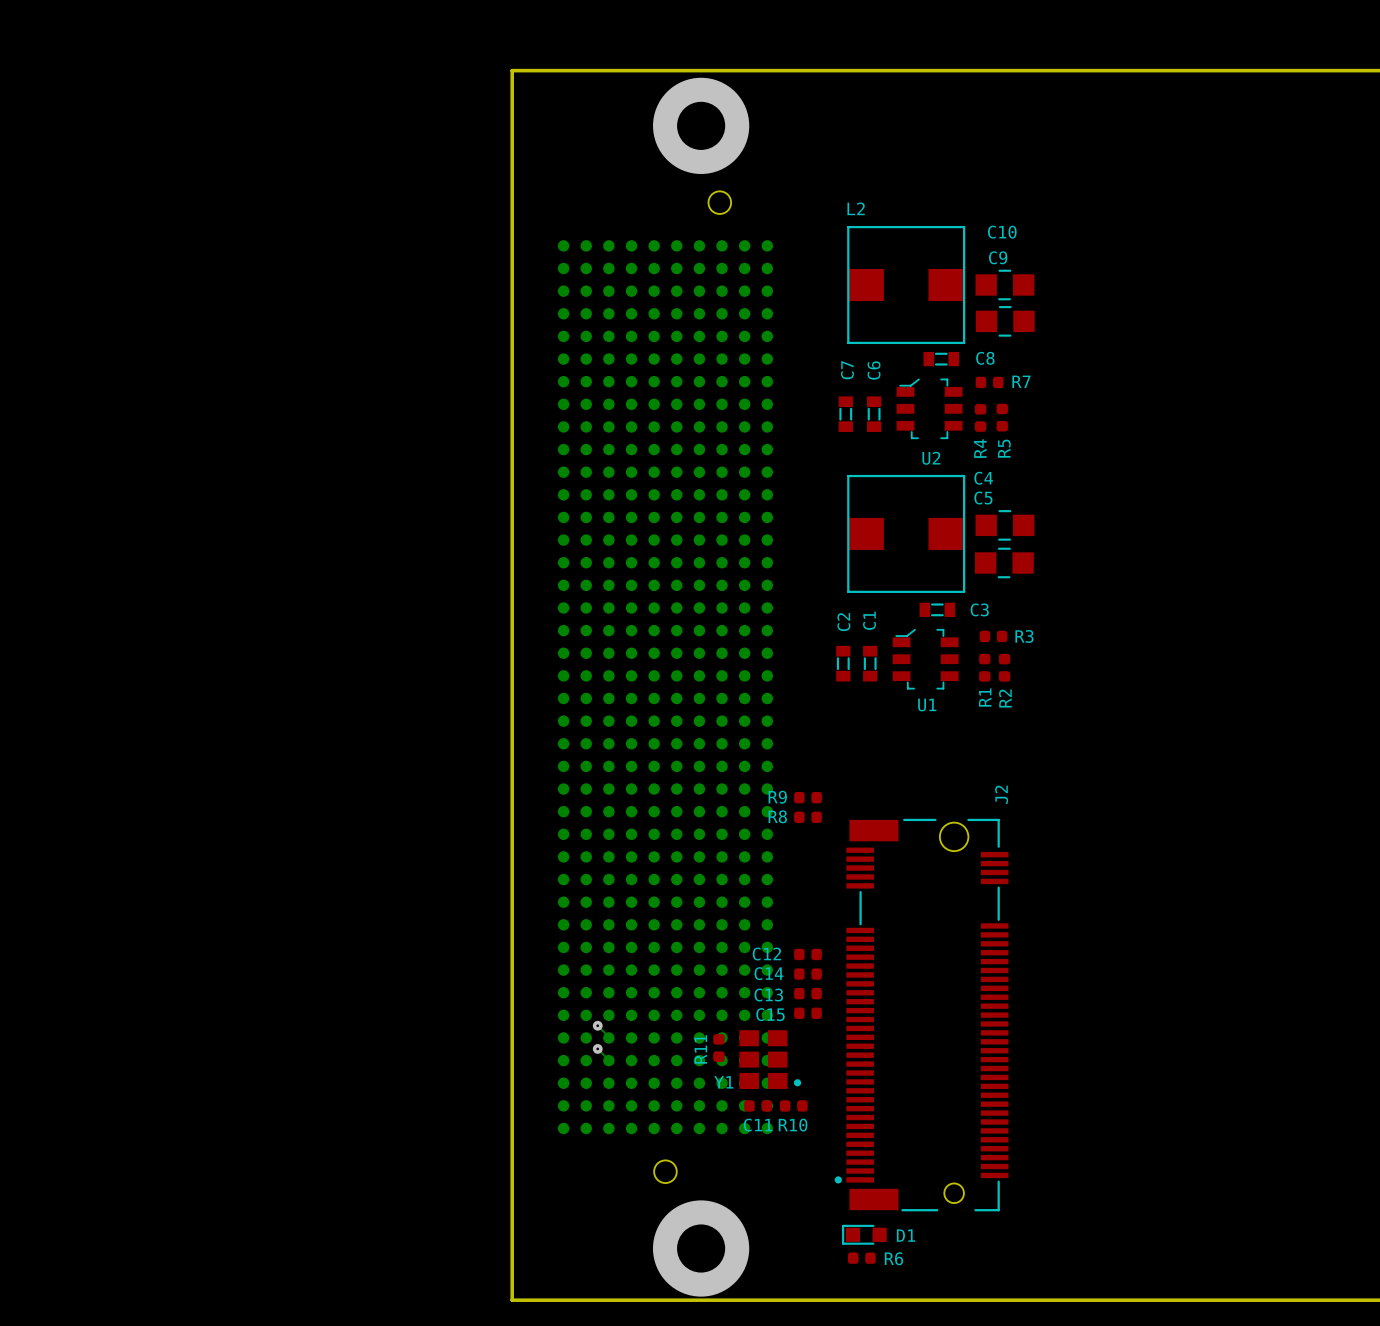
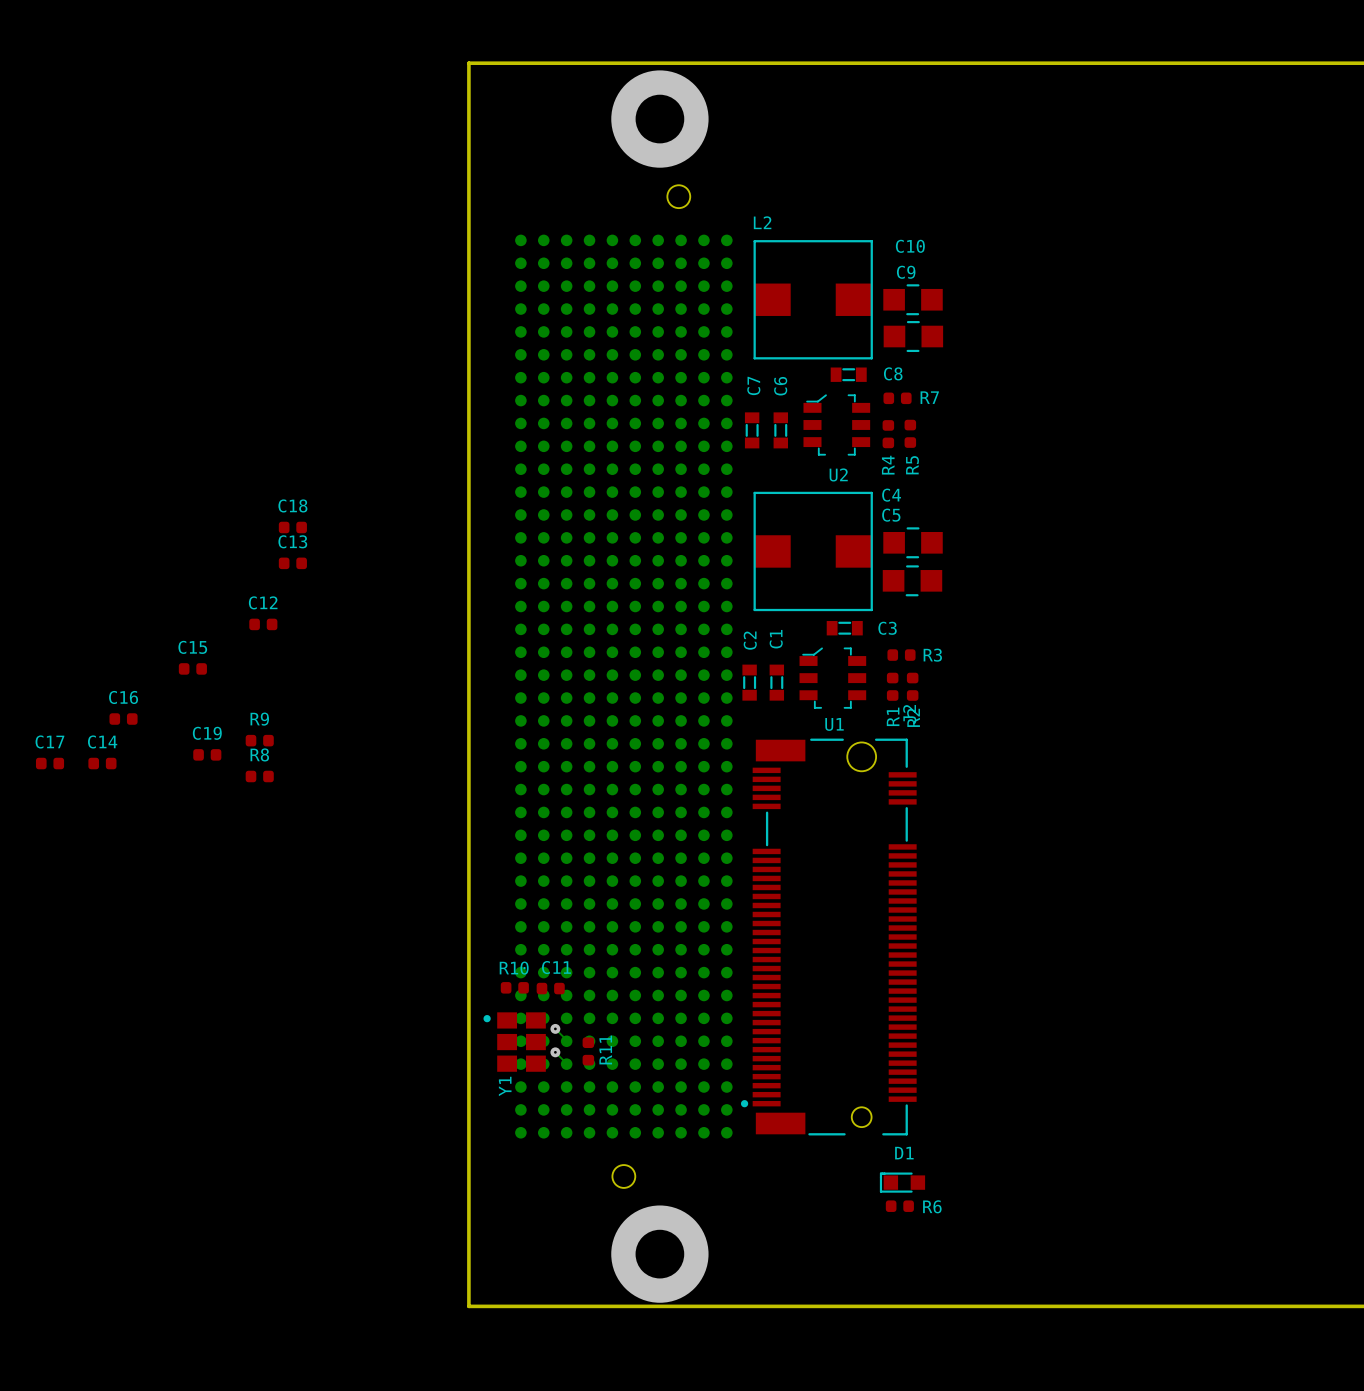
L2 position: (906, 285) -> (813, 299)
C10 position: (1004, 285) -> (913, 299)
C9 position: (1005, 321) -> (913, 336)
C8 position: (941, 359) -> (848, 374)
R7 position: (989, 382) -> (897, 398)
U2 position: (929, 408) -> (836, 424)
C7 position: (845, 414) -> (752, 430)
C6 position: (874, 414) -> (780, 430)
R4 position: (980, 417) -> (888, 434)
R5 position: (1002, 417) -> (910, 433)
C4 position: (1004, 525) -> (913, 542)
C18: none -> (292, 527)
part position: (906, 533) -> (813, 551)
C5 position: (1004, 562) -> (912, 580)
C3 position: (937, 609) -> (844, 628)
R3 position: (993, 636) -> (901, 655)
U1 position: (925, 659) -> (832, 678)
C2 position: (843, 663) -> (749, 682)
C1 position: (870, 663) -> (776, 682)
R1 position: (984, 667) -> (892, 686)
R2 position: (1004, 667) -> (912, 686)
C16: none -> (123, 719)
C19: none -> (207, 754)
C17: none -> (50, 763)
R9 name position: R9 (777, 797) -> R9 (259, 719)
R9 position: (808, 797) -> (259, 740)
R8 name position: R8 (777, 816) -> R8 (259, 754)
R8 position: (808, 817) -> (259, 776)
C12 name position: C12 (766, 954) -> C12 (263, 602)
C12 position: (808, 954) -> (263, 624)
C14 name position: C14 (768, 973) -> C14 (102, 741)
C14 position: (808, 974) -> (102, 763)
C13 position: (808, 993) -> (292, 563)
C13 name position: C13 (768, 995) -> C13 (292, 541)
C15 position: (808, 1013) -> (192, 668)
C15 name position: C15 (770, 1014) -> C15 (192, 647)
J2 position: (921, 1015) -> (828, 937)
R11 position: (718, 1048) -> (588, 1051)
R11 name position: R11 (700, 1049) -> R11 (605, 1049)
Y1 rotation: 0° (770, 1059) -> 180° (514, 1042)
Y1 position: (770, 1059) -> (514, 1042)
Y1 name position: Y1 (723, 1082) -> Y1 (505, 1086)
C11 position: (758, 1105) -> (550, 988)
R10 position: (793, 1105) -> (514, 987)
C11 name position: C11 (758, 1125) -> C11 (556, 967)
R10 name position: R10 (793, 1125) -> R10 (514, 968)
D1 position: (864, 1234) -> (902, 1182)
D1 name position: D1 (906, 1235) -> D1 (904, 1153)
R6 position: (861, 1258) -> (899, 1206)

